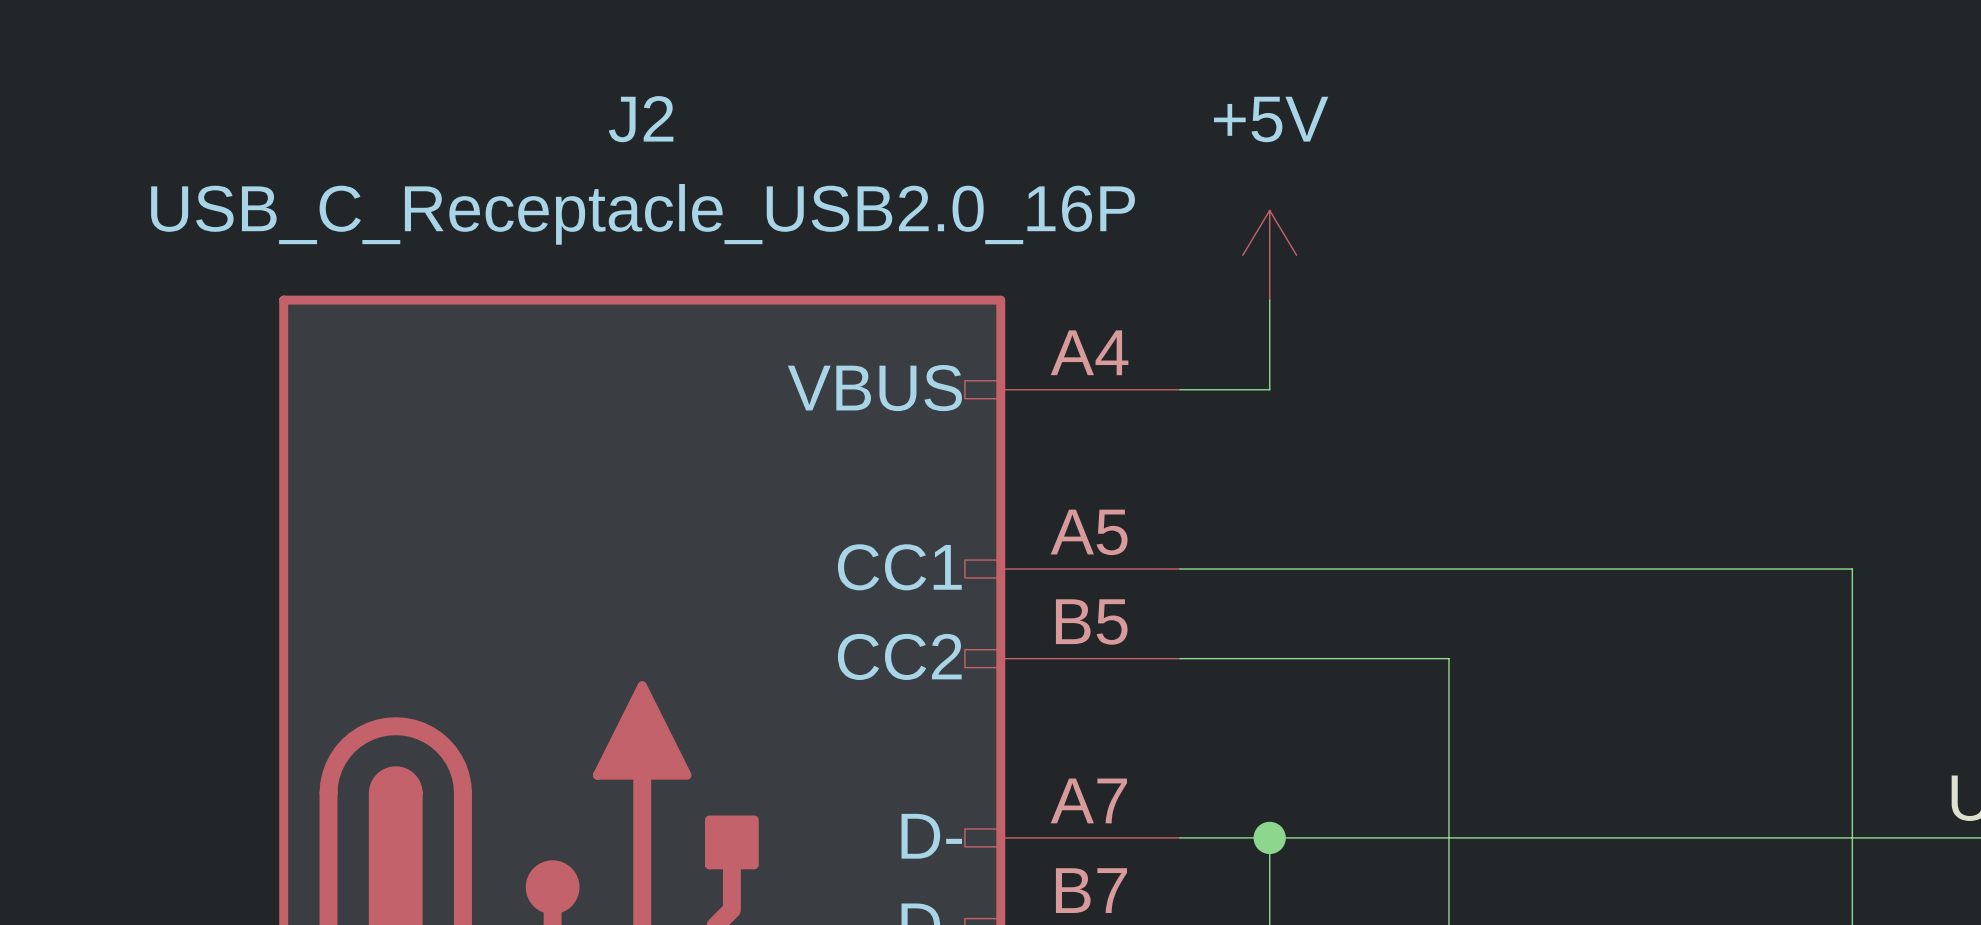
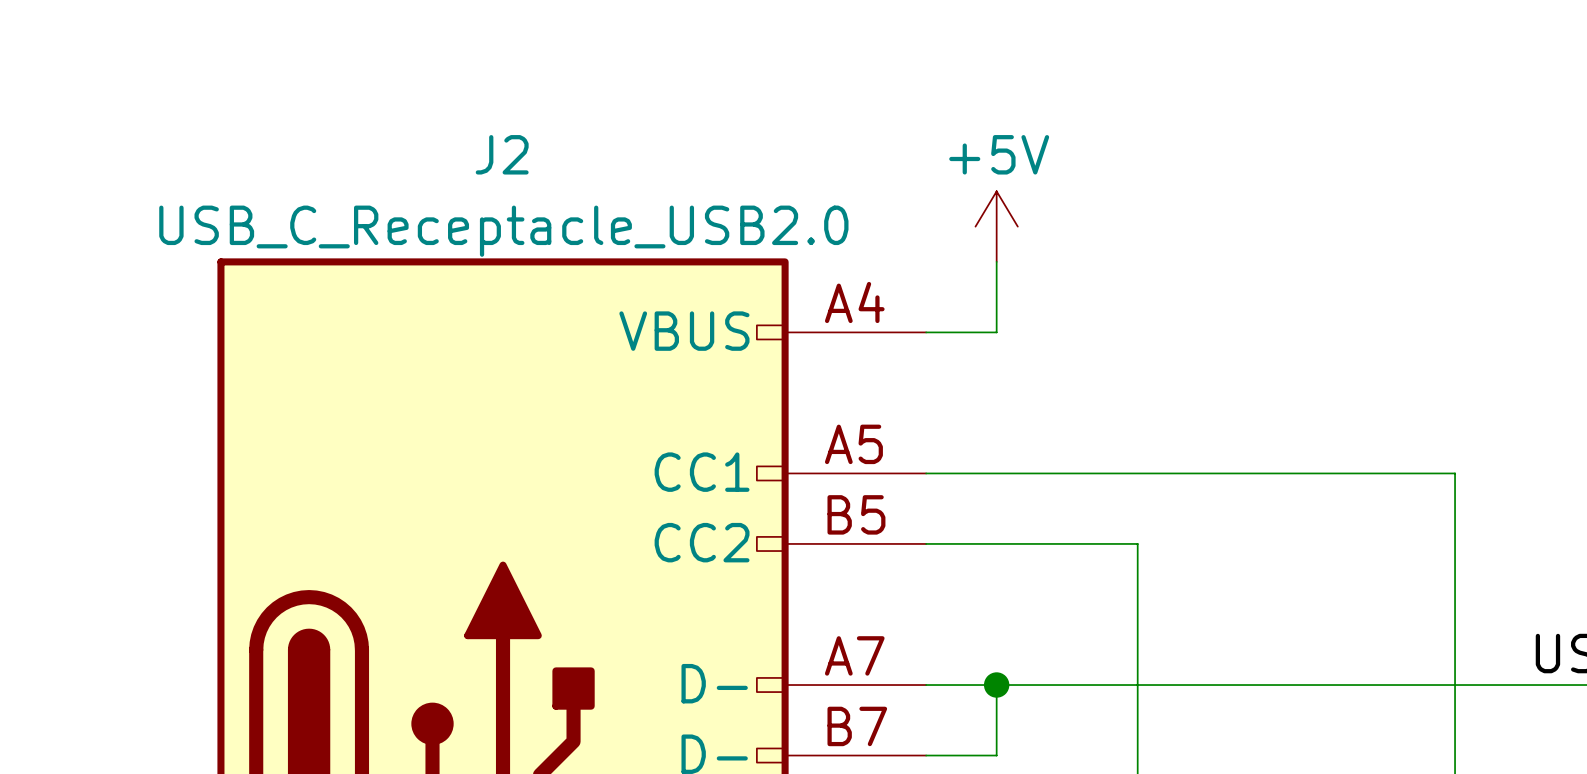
J2 name position: J2 (641, 119) -> J2 (502, 154)
power symbol text position: +5V (1271, 119) -> +5V (999, 154)
J2 value: USB_C_Receptacle_USB2.0_16P (643, 214) -> USB_C_Receptacle_USB2.0 (503, 231)

